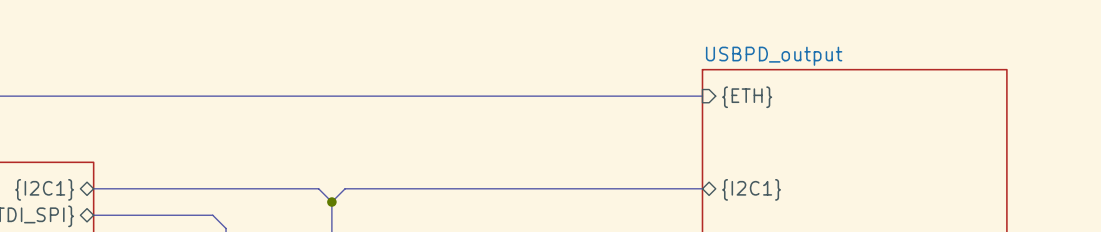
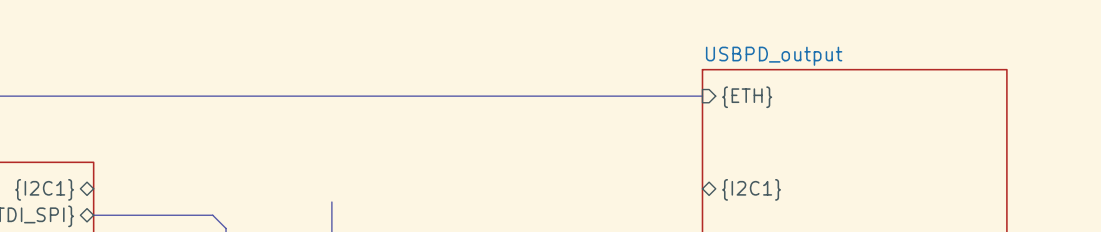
bus: (93, 188) (318, 188) (331, 202) (345, 188) (702, 188) -> none
junction: (331, 202) -> none

